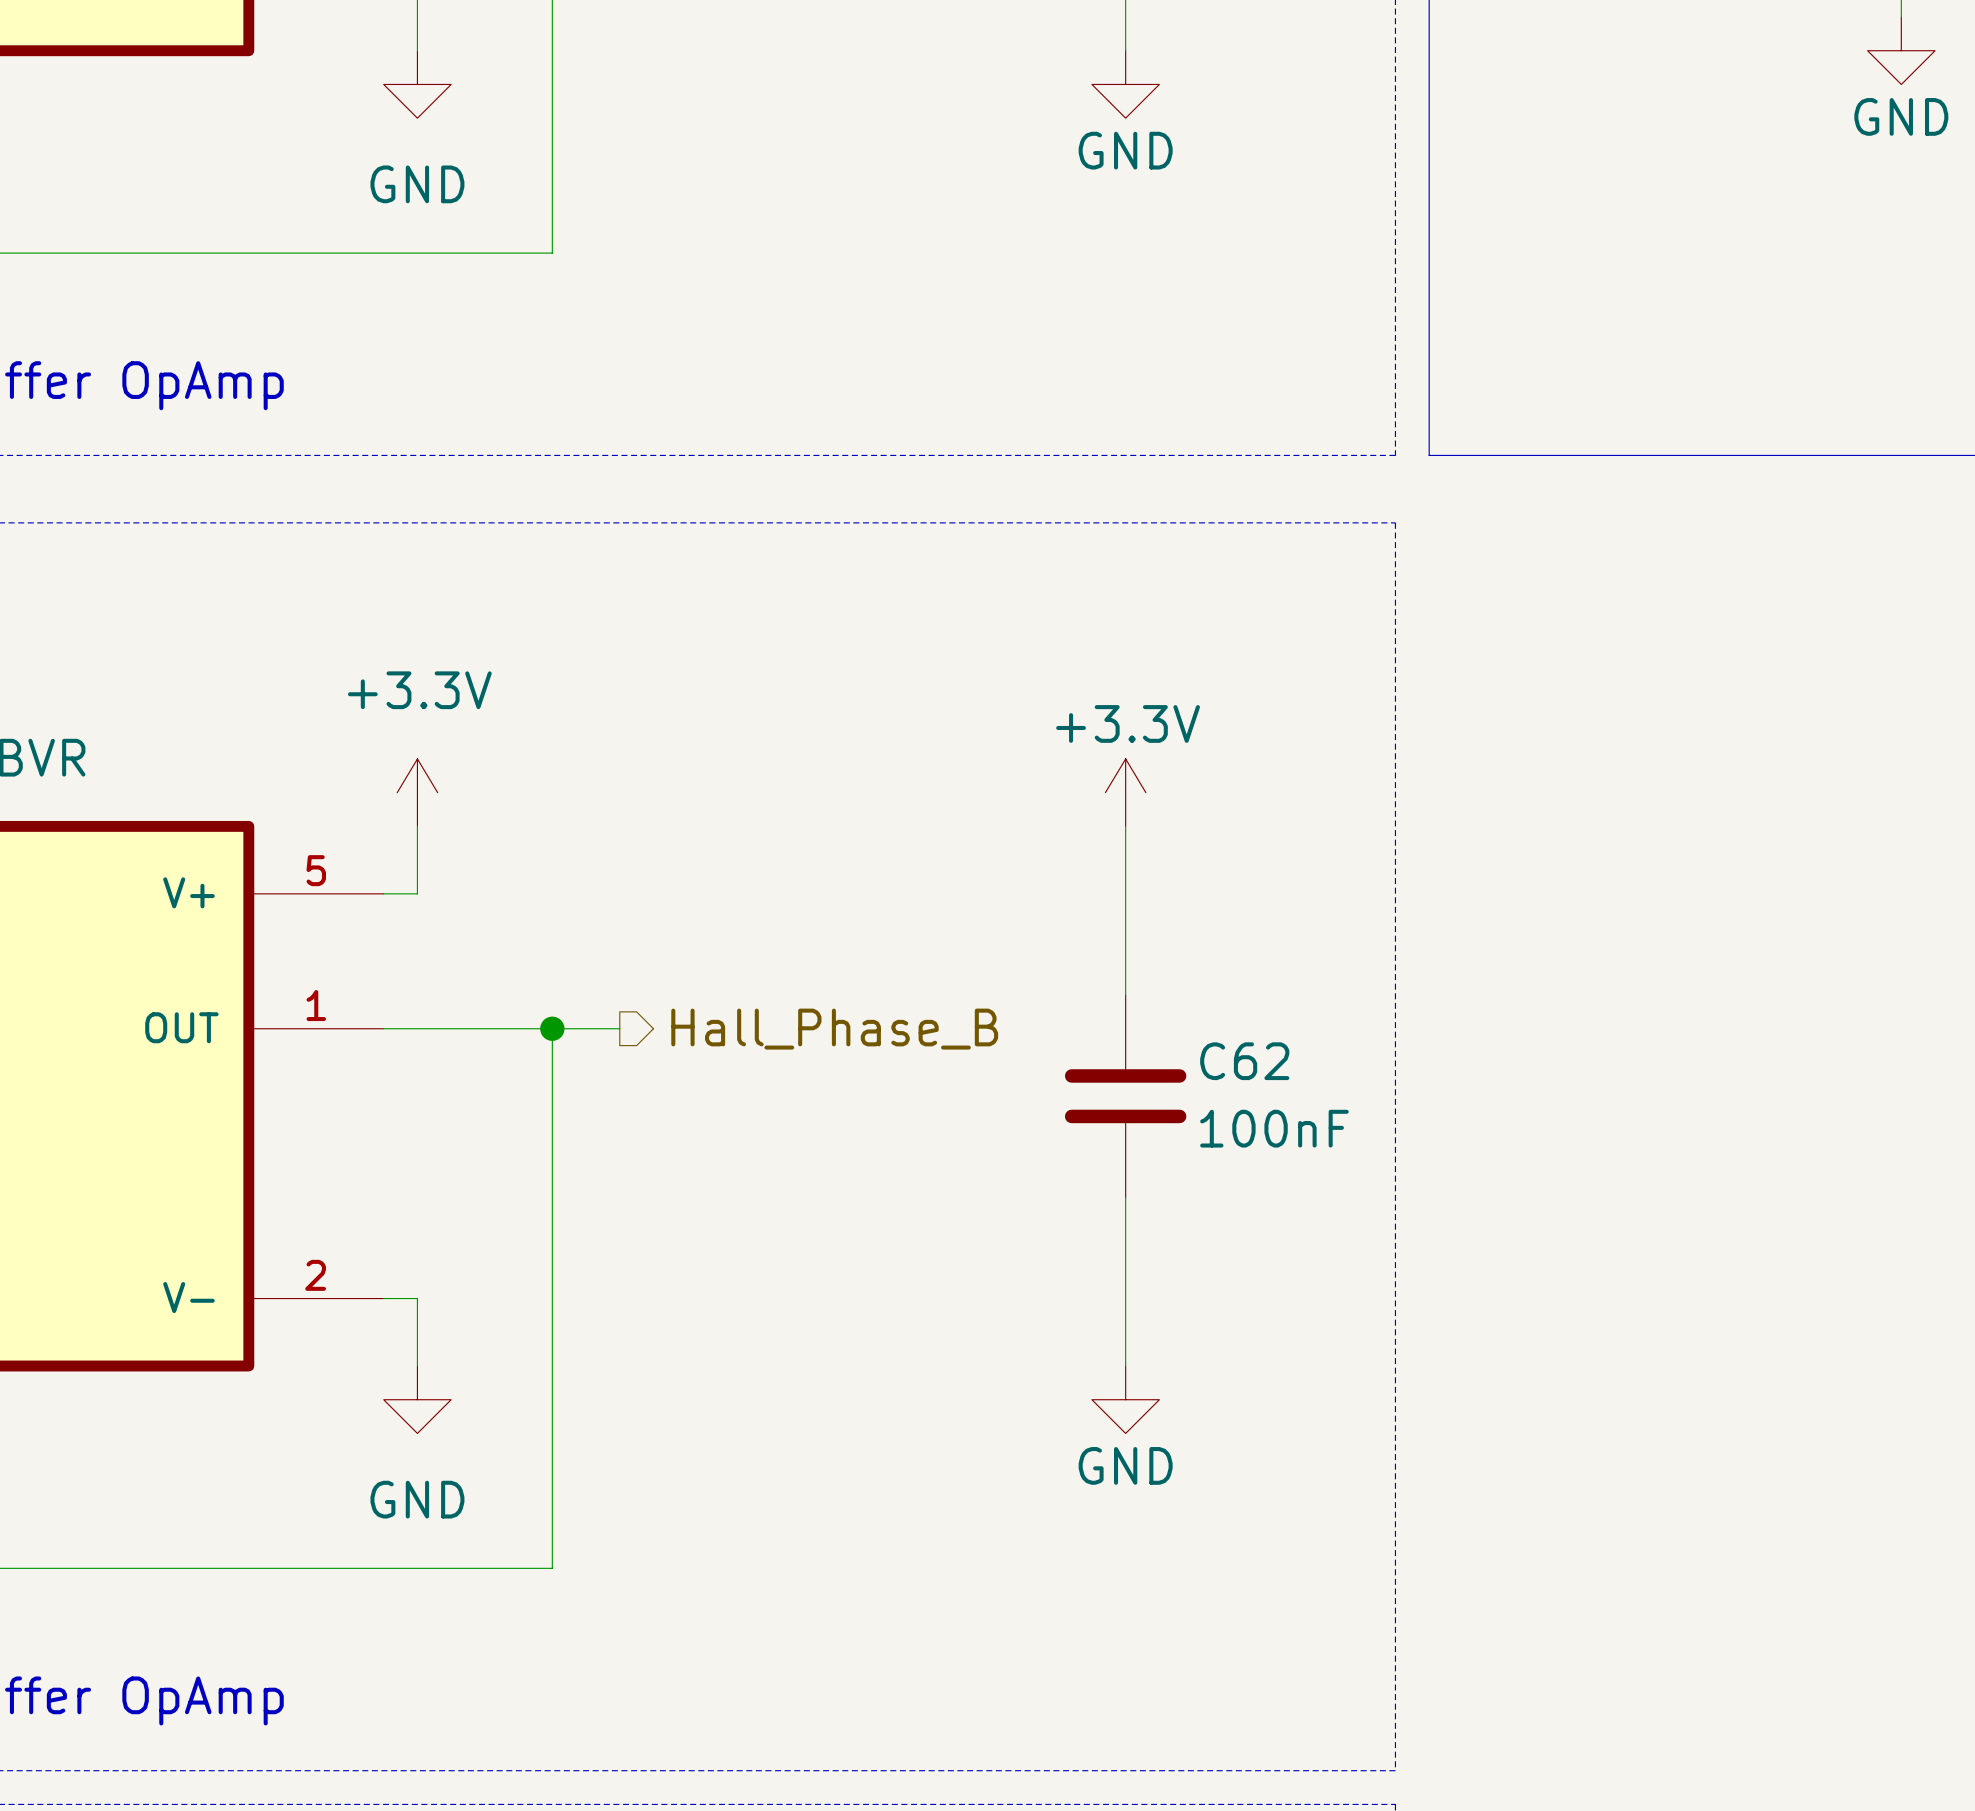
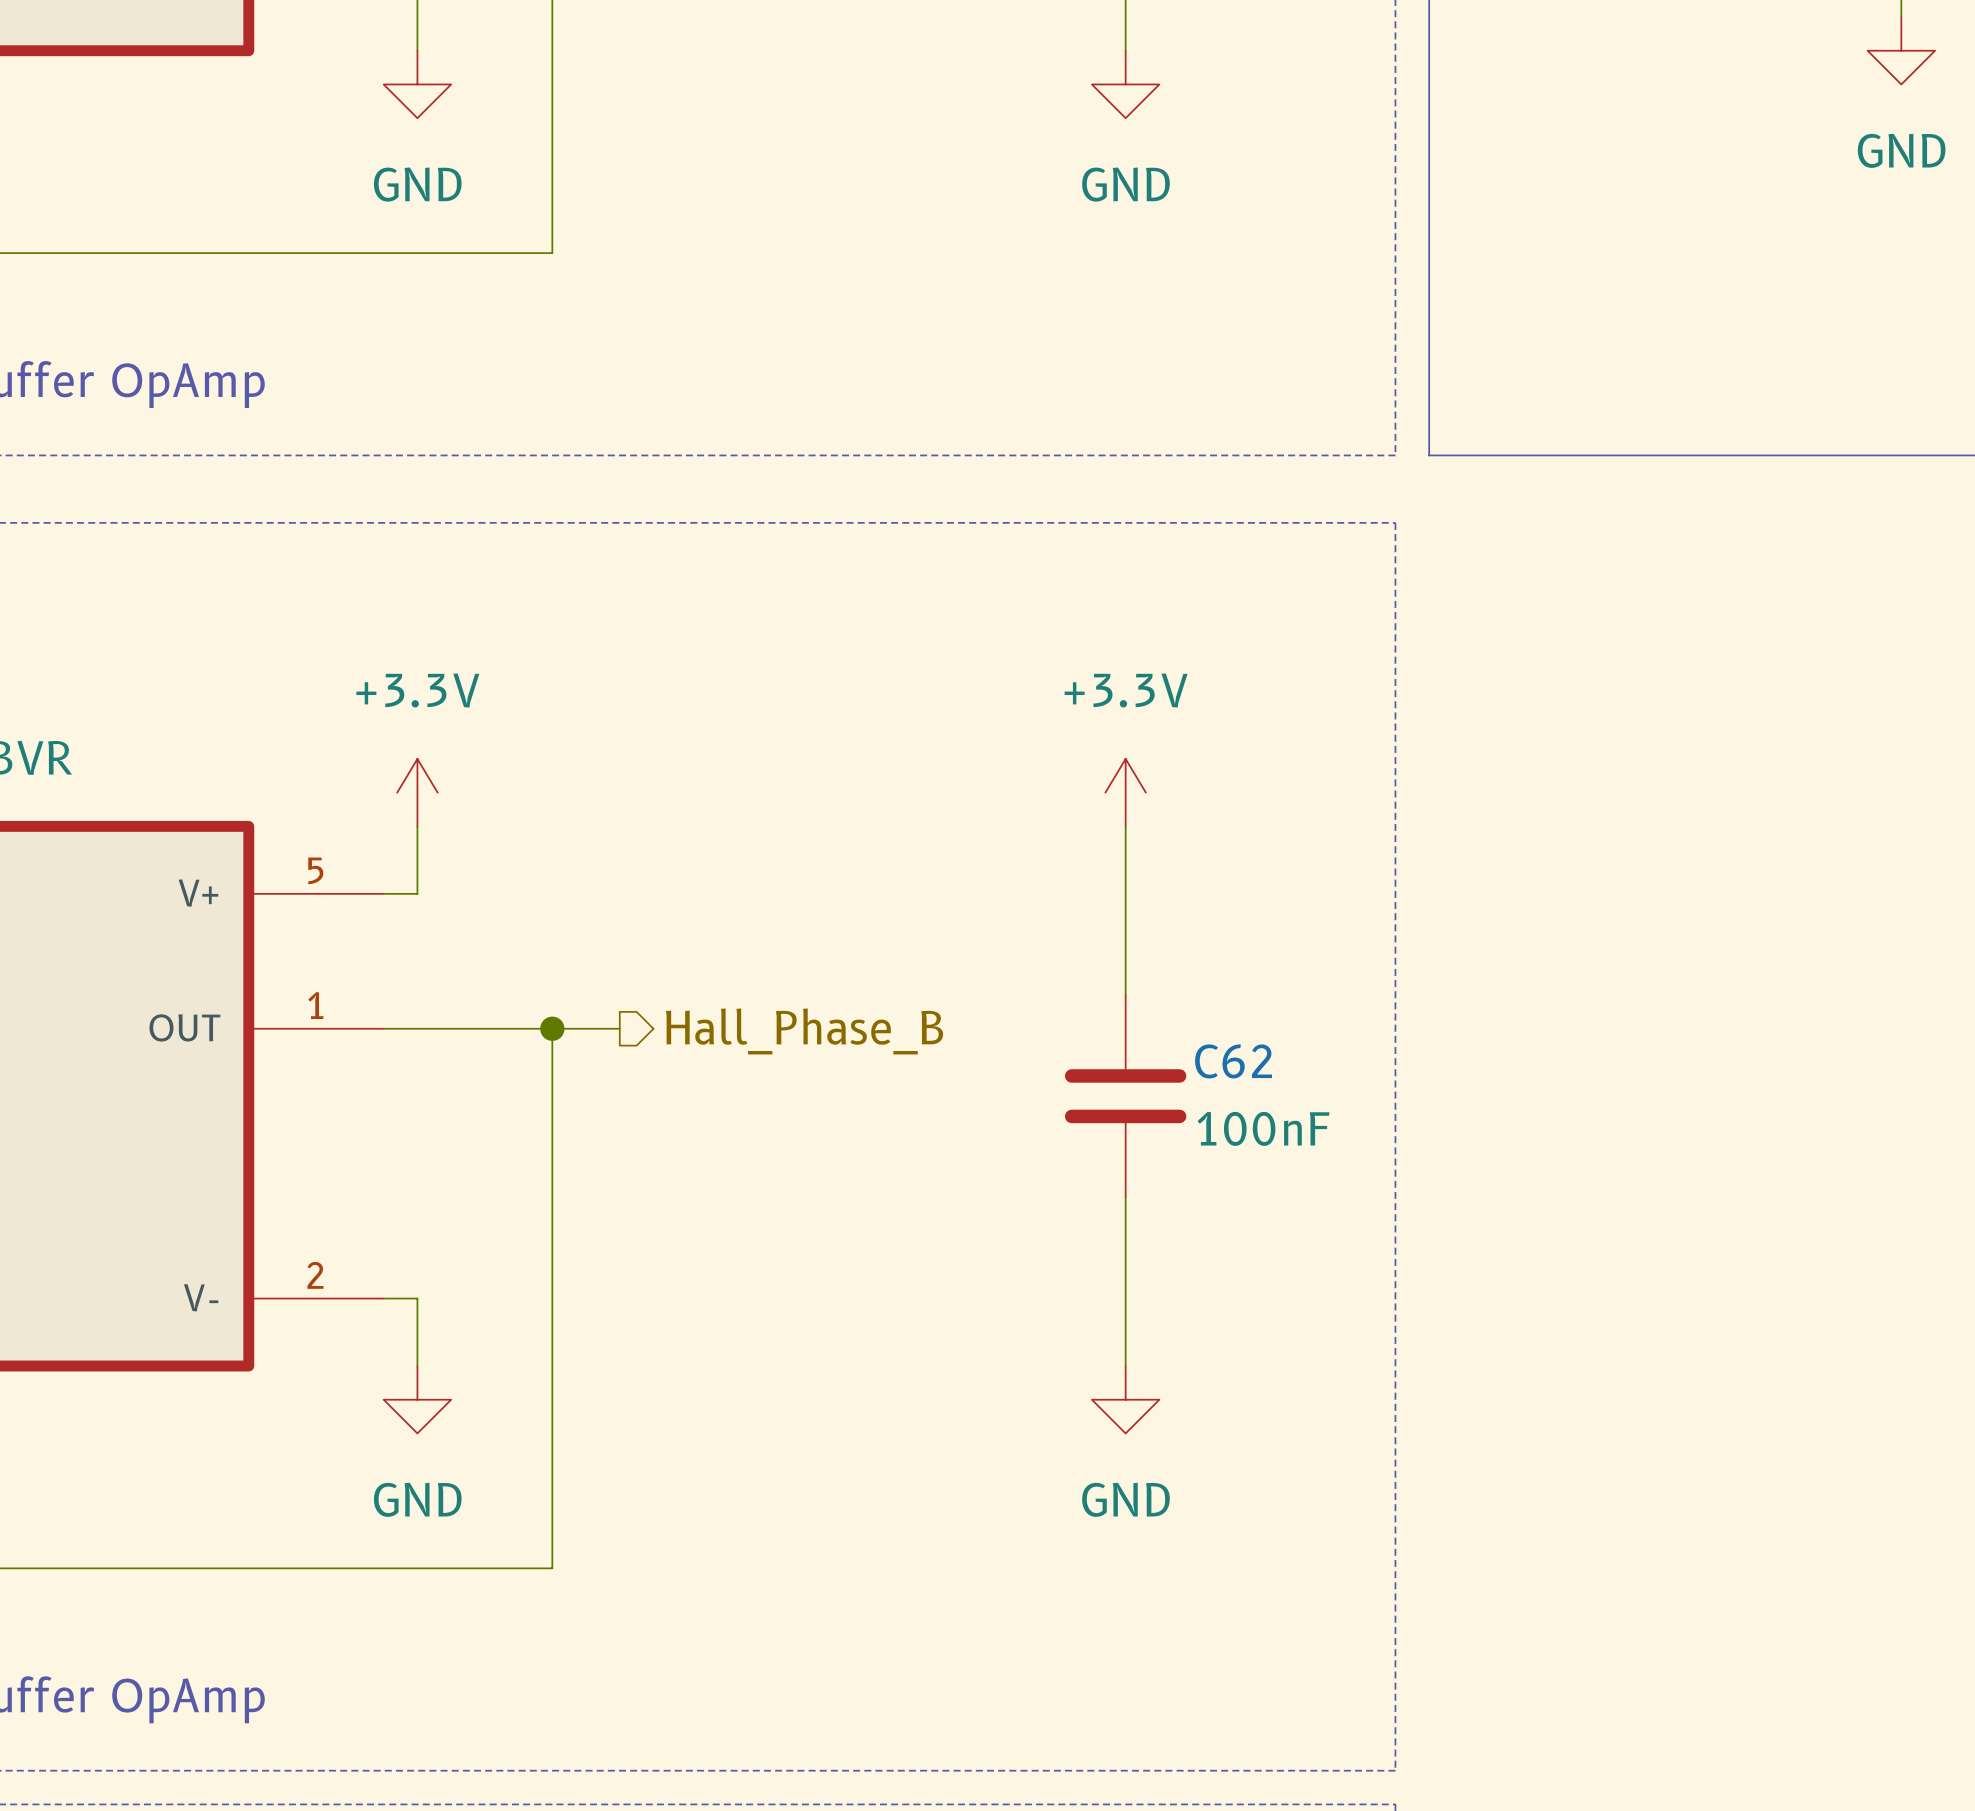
power symbol text position: GND (1901, 116) -> GND (1901, 150)
power symbol text position: GND (1125, 150) -> GND (1125, 184)
power symbol text position: +3.3V (1128, 723) -> +3.3V (1126, 690)
power symbol text position: GND (1125, 1465) -> GND (1125, 1499)

